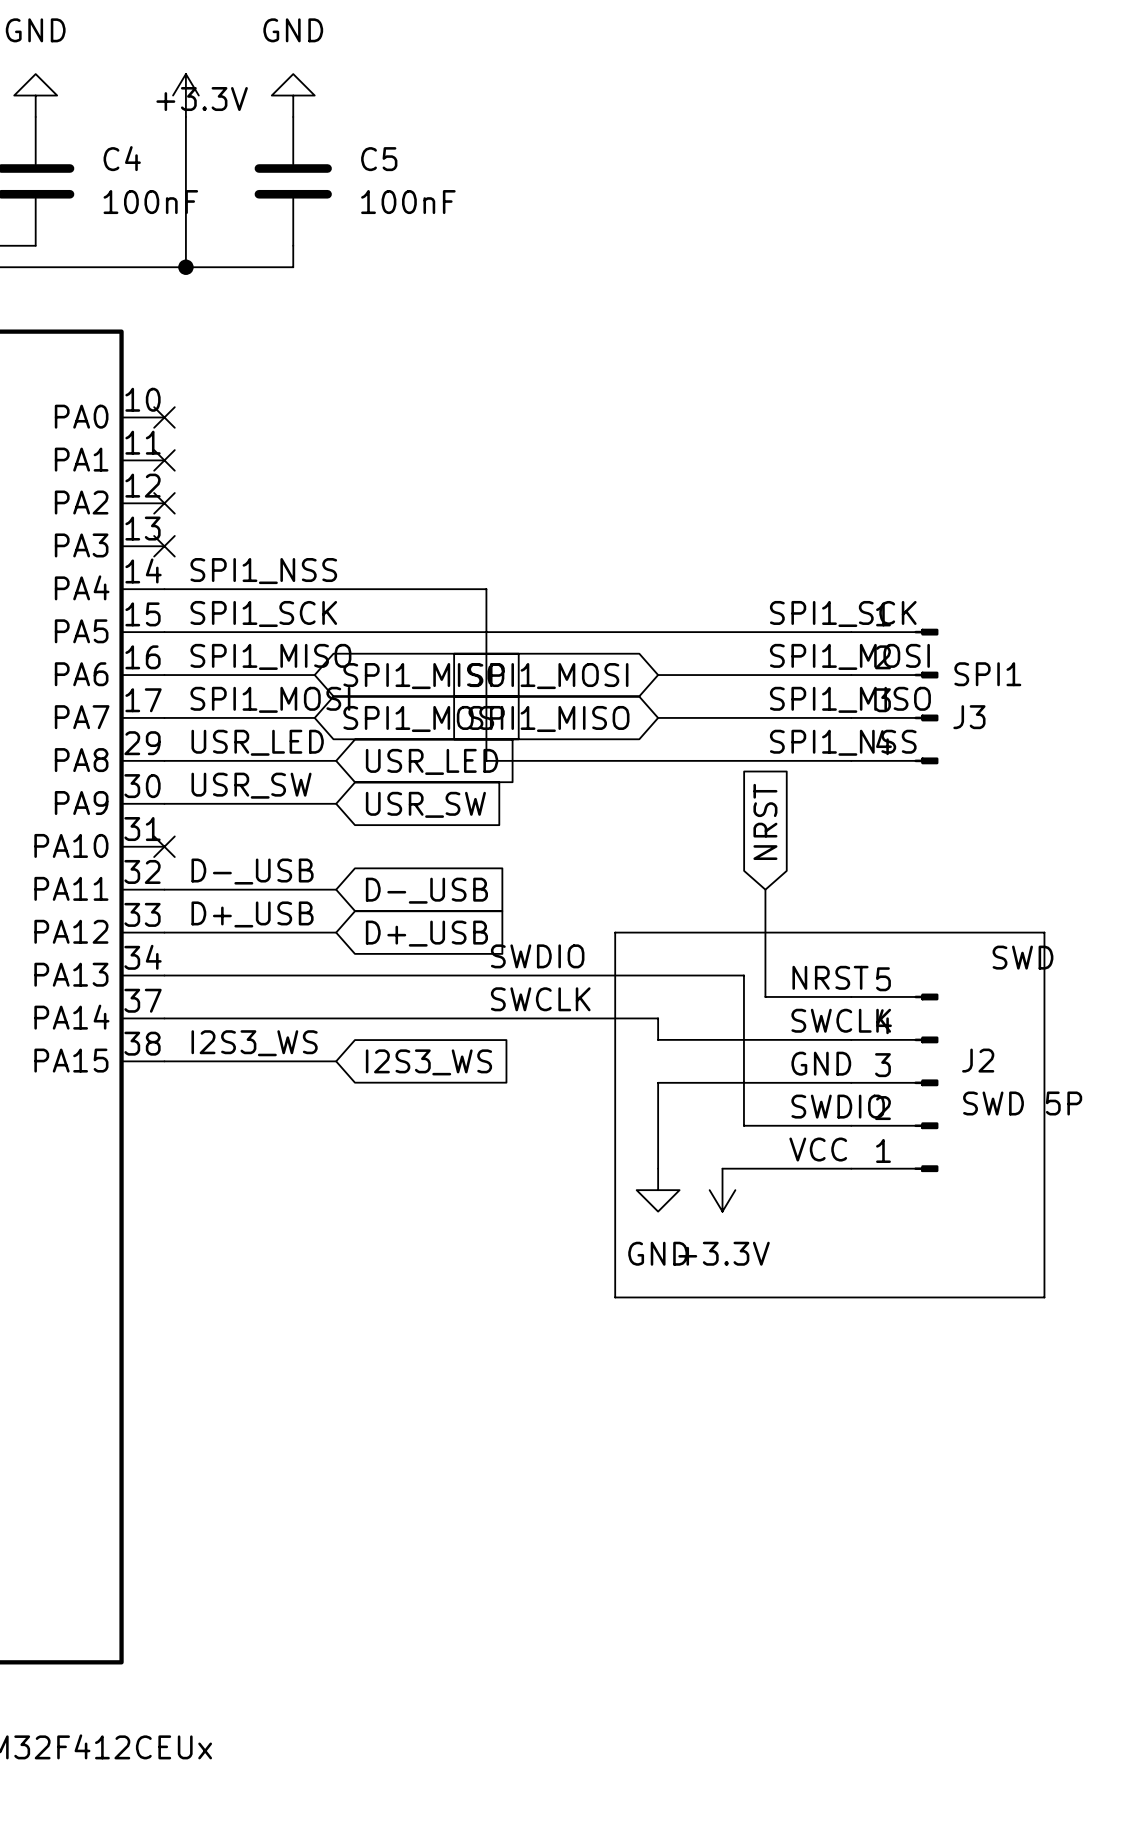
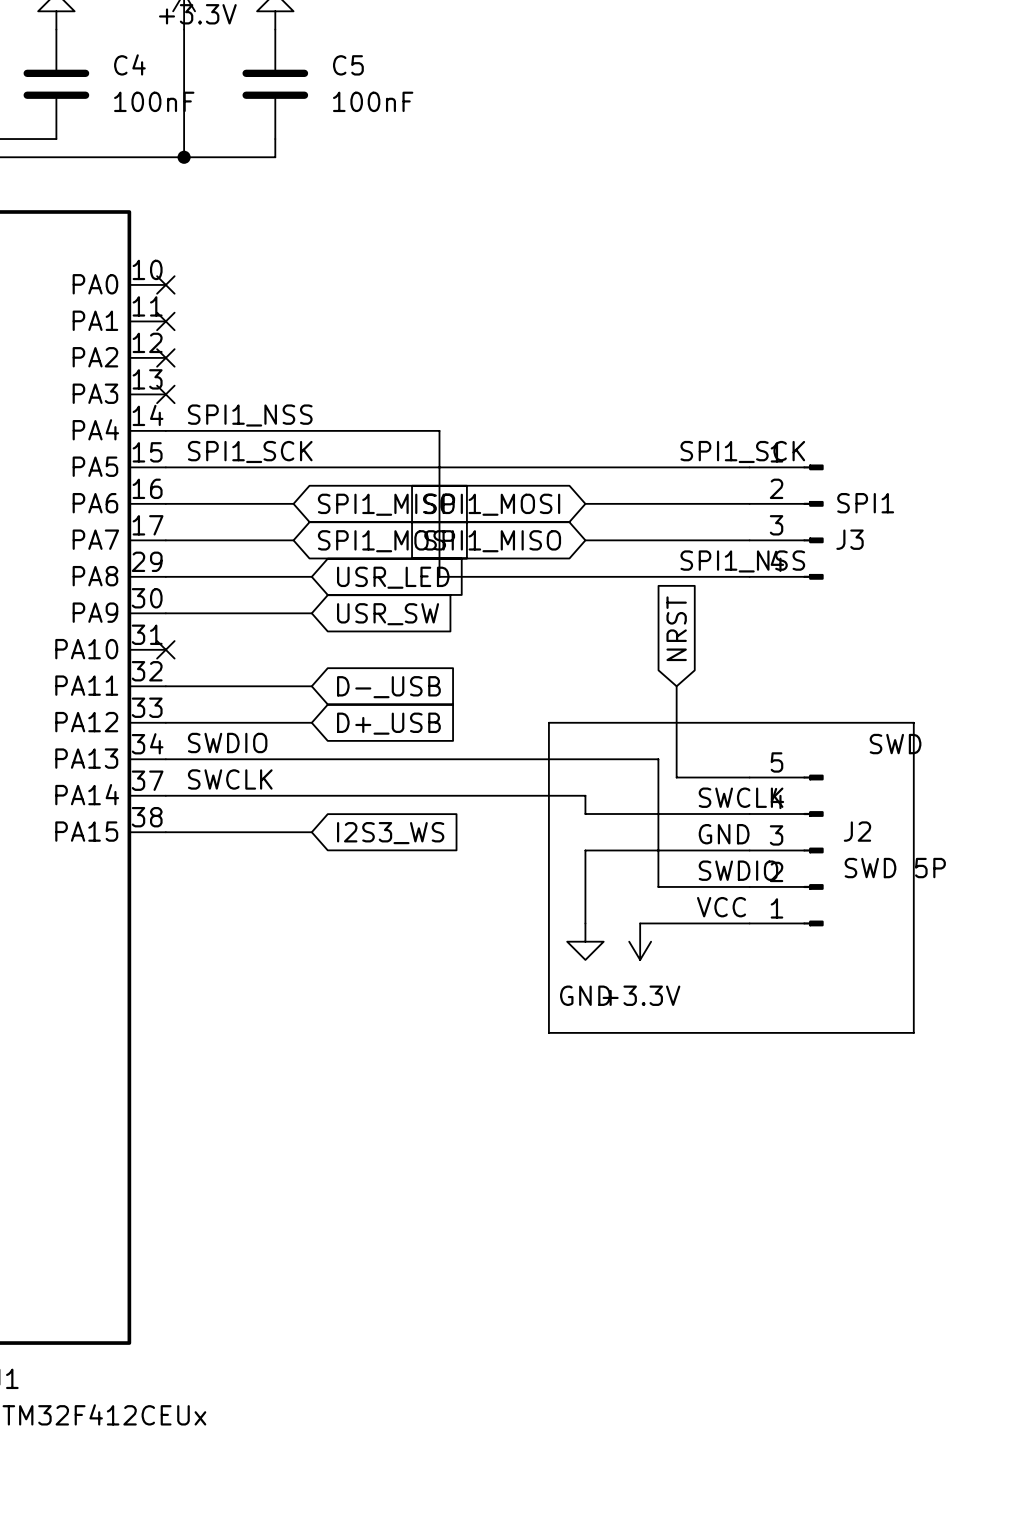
label: SPI1_MISO (270, 656) -> none
label: SPI1_MOSI (849, 656) -> none
label: SPI1_MOSI (270, 699) -> none
label: SPI1_MISO (850, 699) -> none
label: USR_LED (257, 742) -> none
label: USR_SW (251, 785) -> none
label: D-_USB (252, 871) -> none
label: D+_USB (252, 914) -> none
label position: SWDIO (537, 956) -> SWDIO (227, 742)
label: NRST (830, 977) -> none
label position: SWCLK (540, 999) -> SWCLK (230, 779)
label: I2S3_WS (254, 1043) -> none

